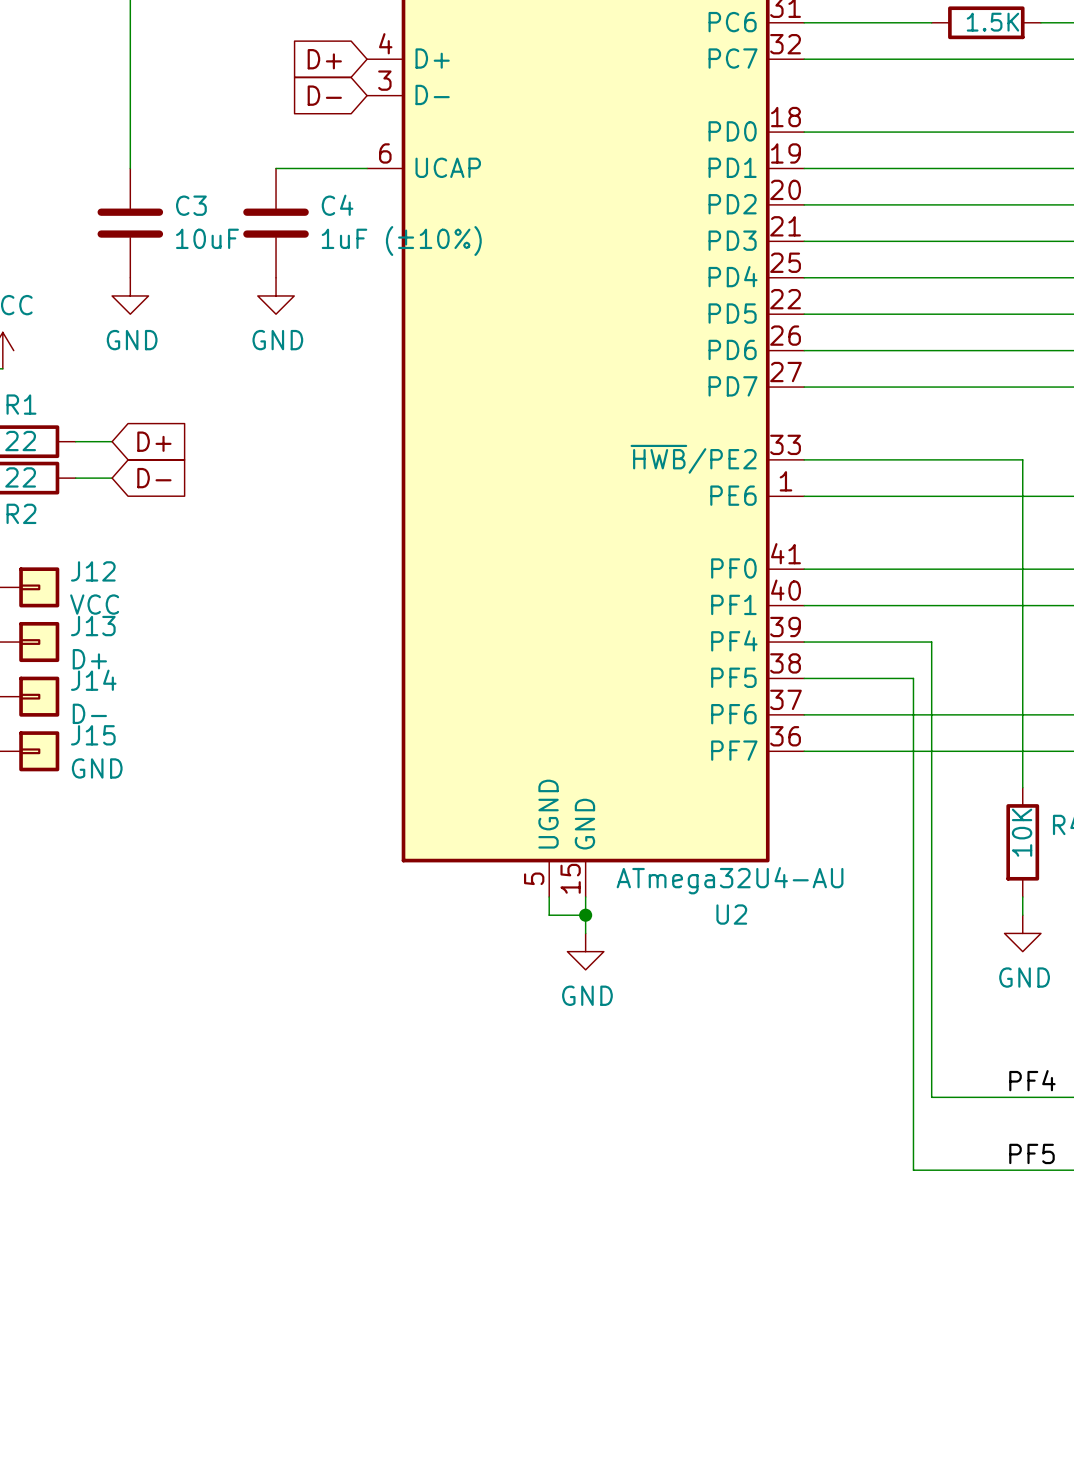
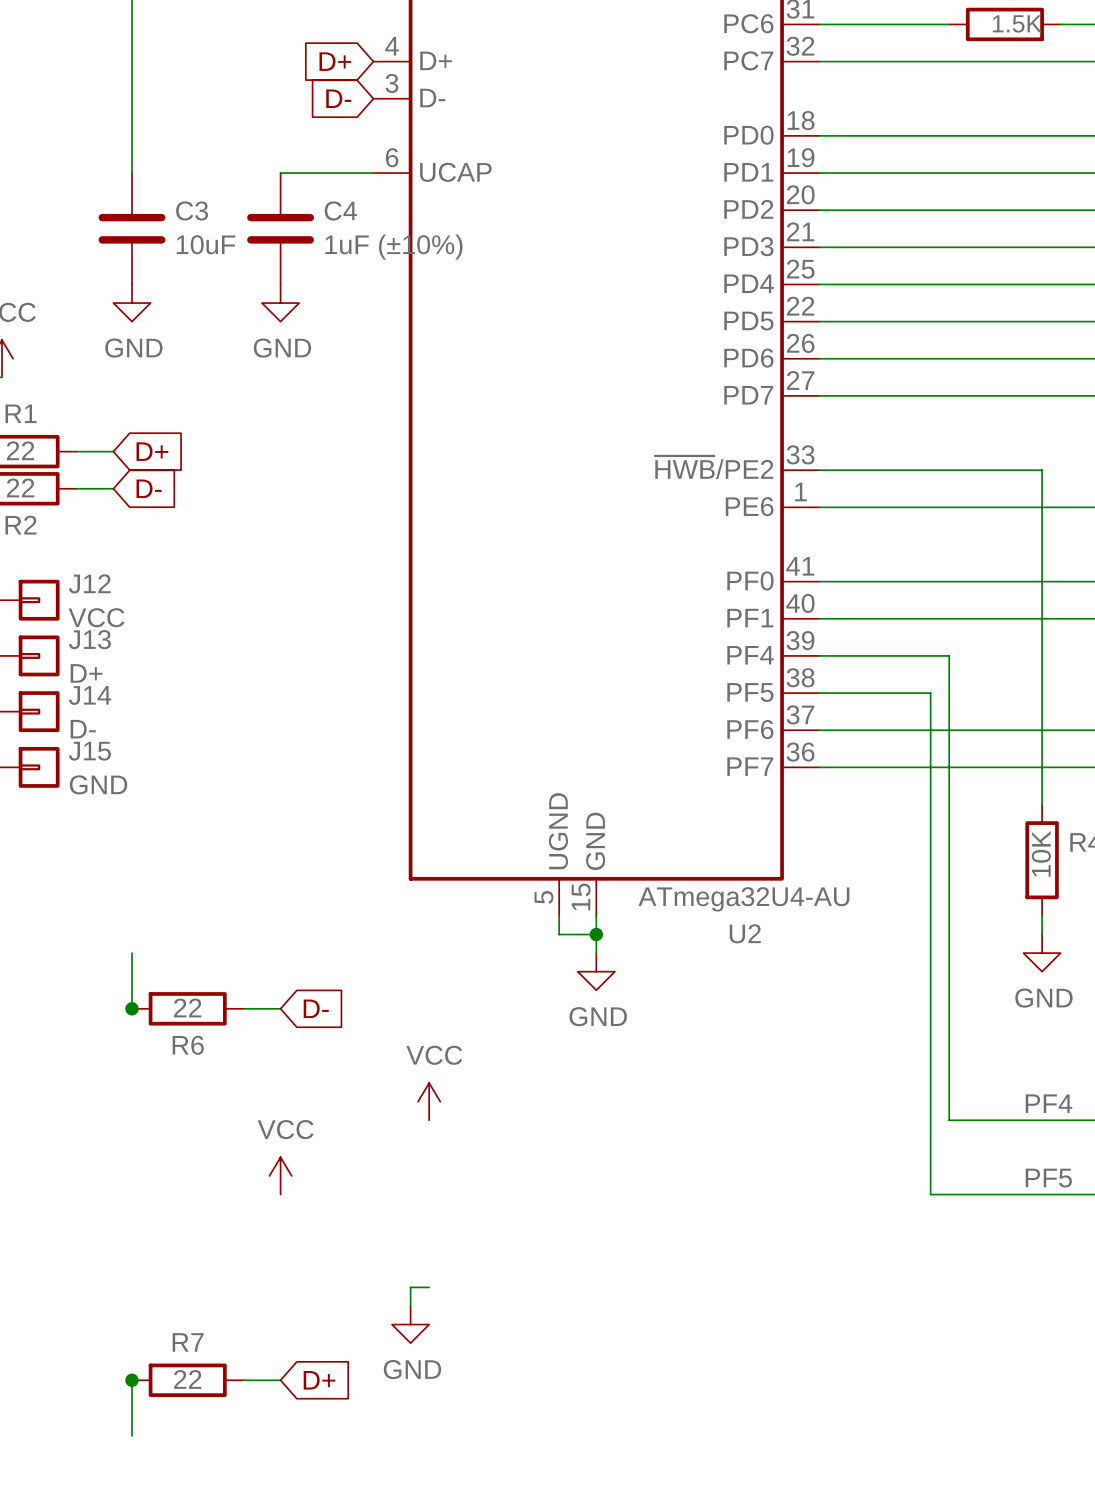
wire: none -> (131, 953) (131, 1008)
junction: none -> (131, 1008)
R6: none -> 22 (187, 1008)
wire: none -> (243, 1008) (280, 1008)
global label: none -> D- (316, 1008)
power symbol: none -> VCC (429, 1101)
power symbol: none -> VCC (280, 1175)
wire: none -> (429, 1287) (410, 1287) (410, 1305)
power symbol: none -> GND (410, 1324)
wire: none -> (131, 1380) (131, 1436)
junction: none -> (131, 1380)
R7: none -> 22 (187, 1380)
wire: none -> (243, 1380) (280, 1380)
global label: none -> D+ (319, 1380)

